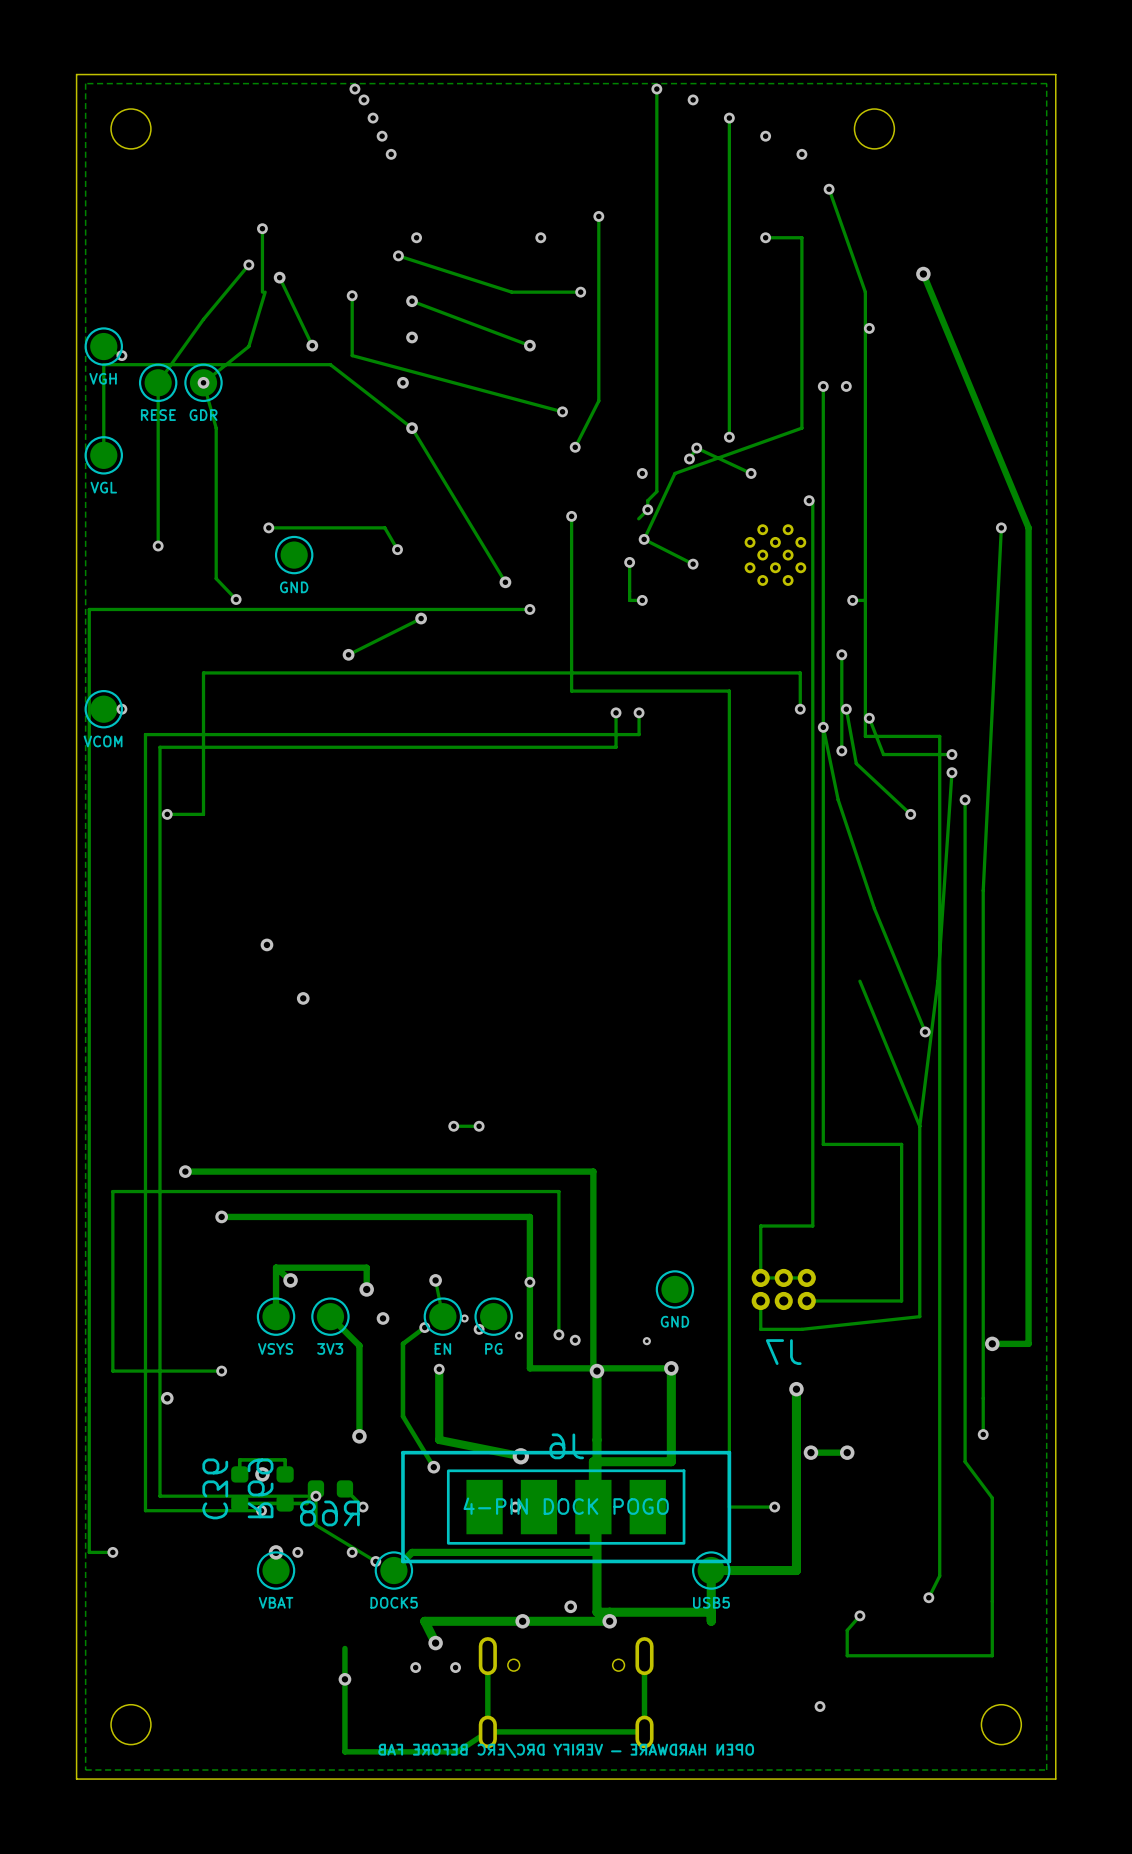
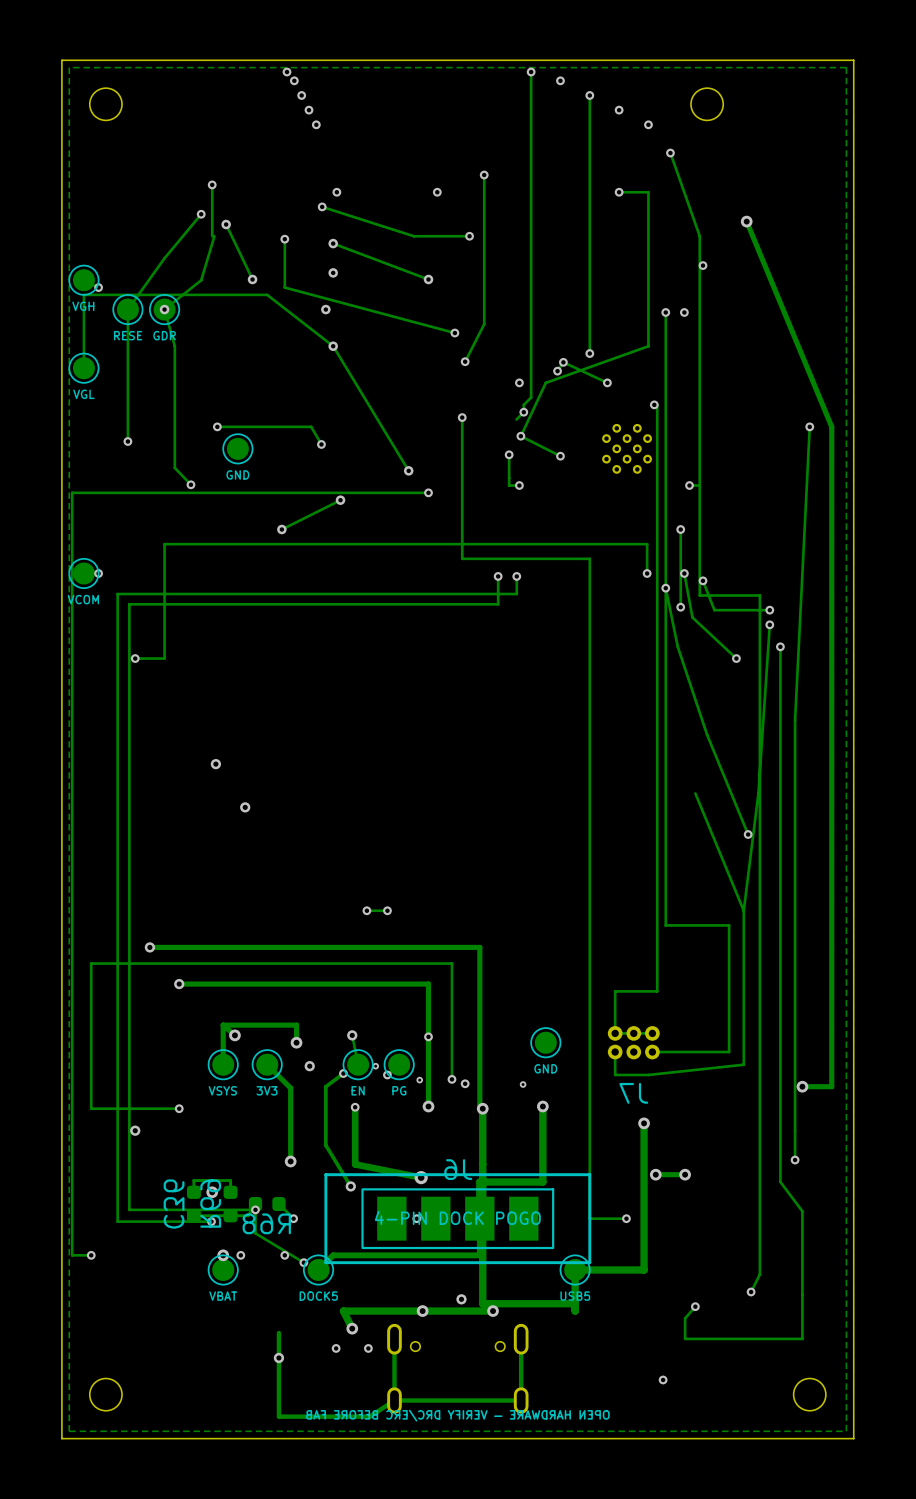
via: none -> (428, 1106)
track: (671, 1368) (529, 1368) -> none

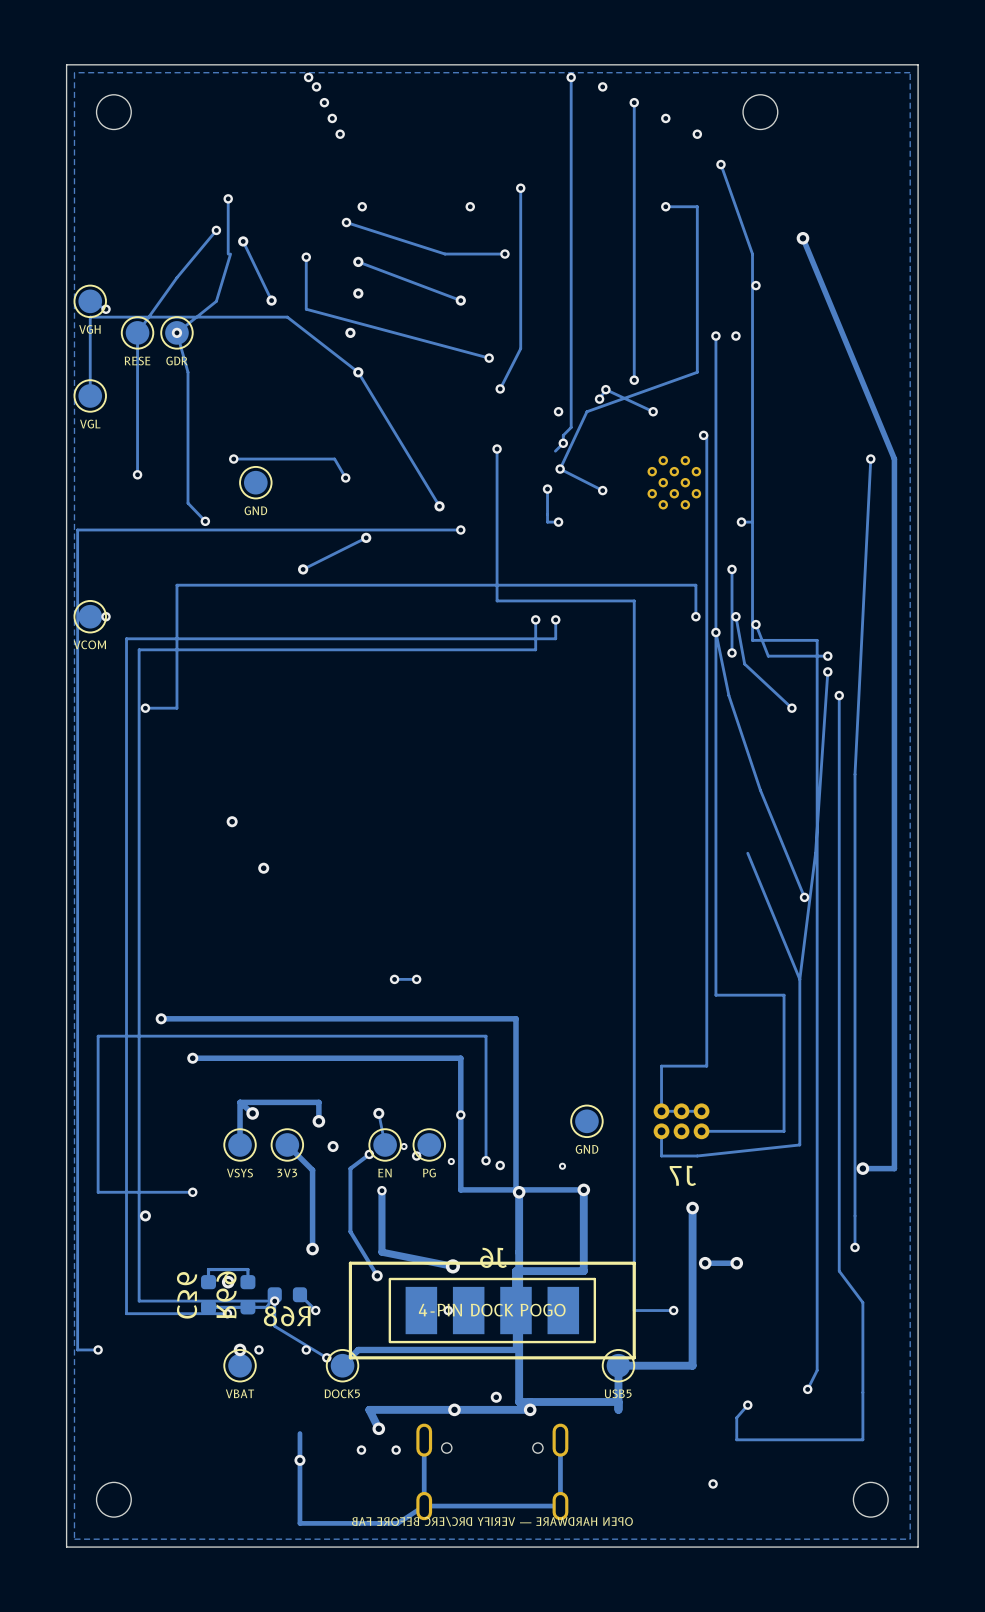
via: (428, 1106) -> none
track: none -> (583, 1189) (460, 1189)

